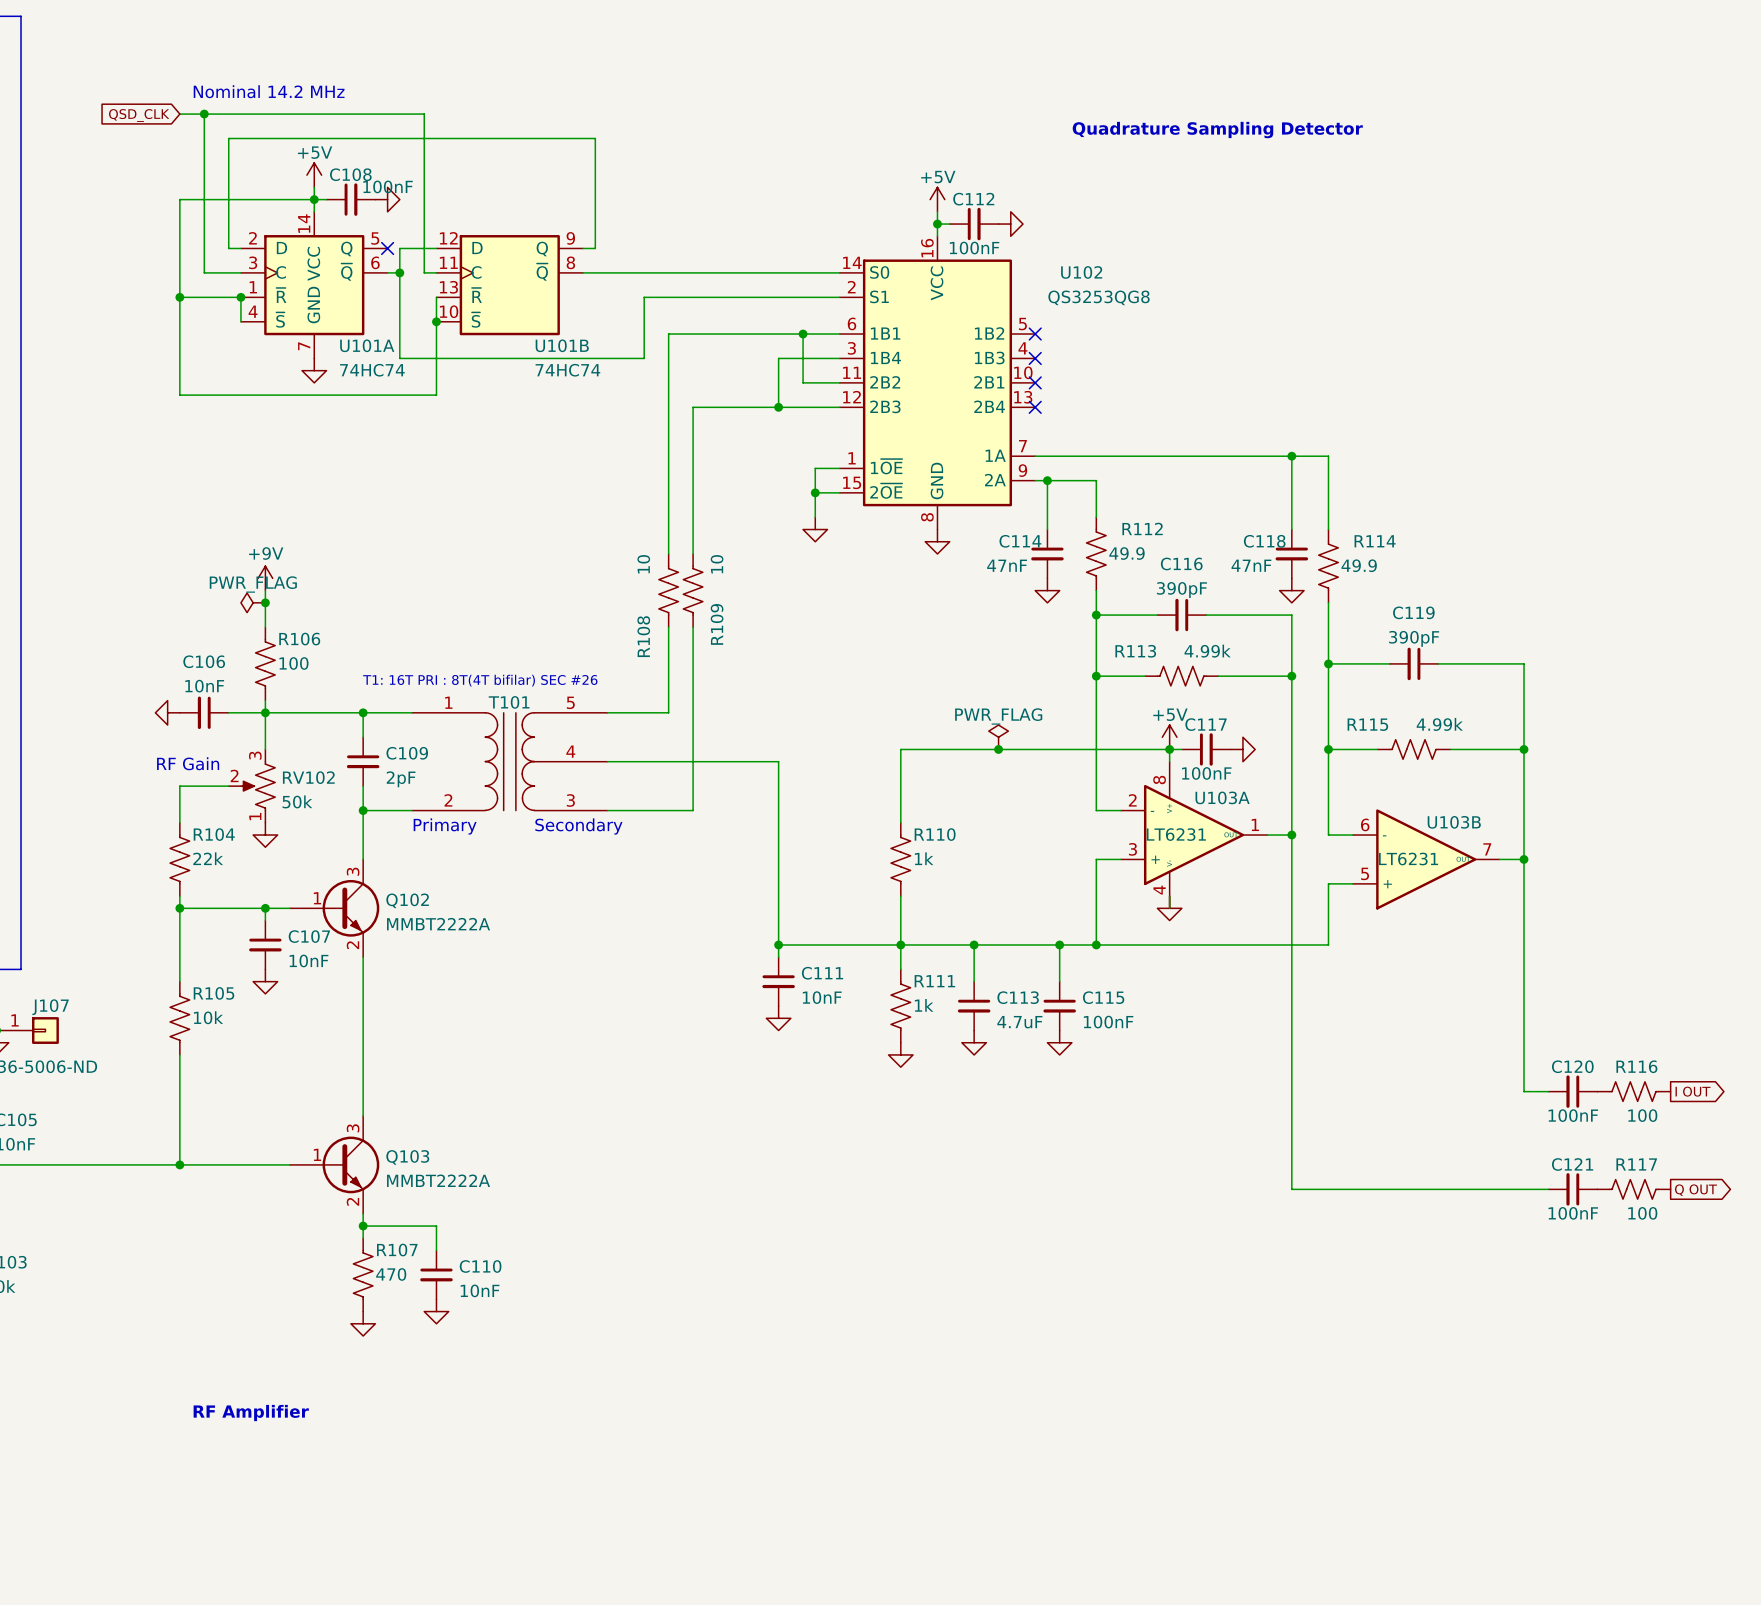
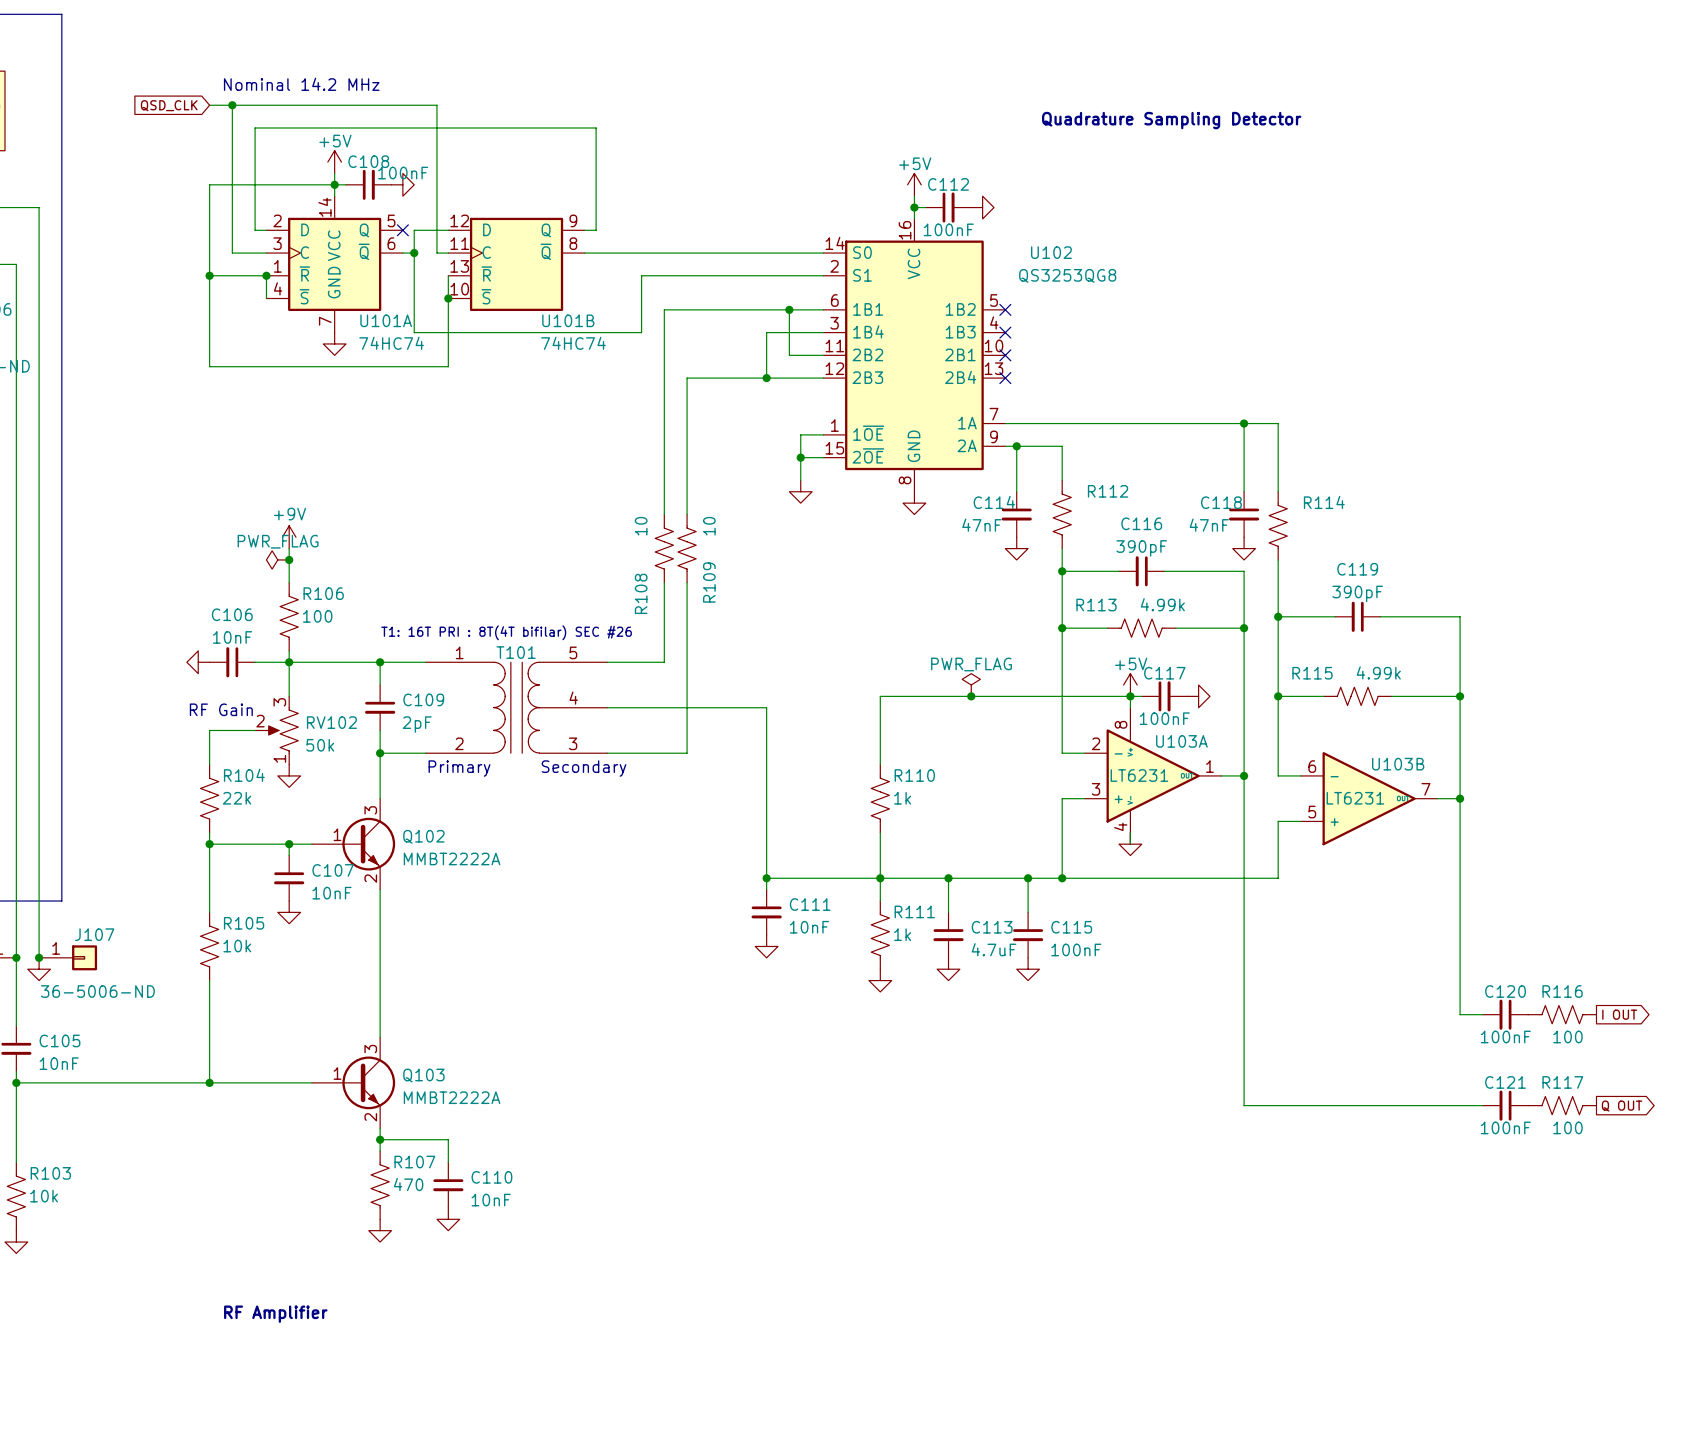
R112 value: 49.9 (1127, 553) -> none
R114 value: 49.9 (1359, 565) -> none

